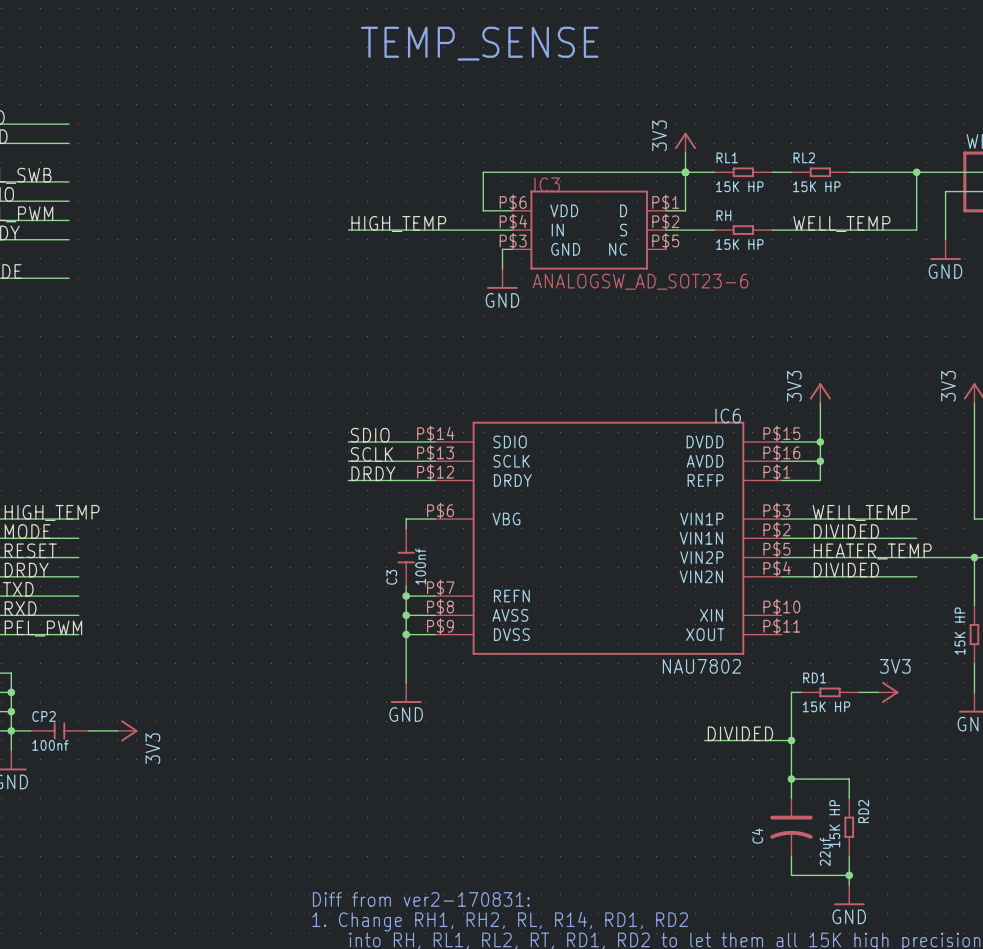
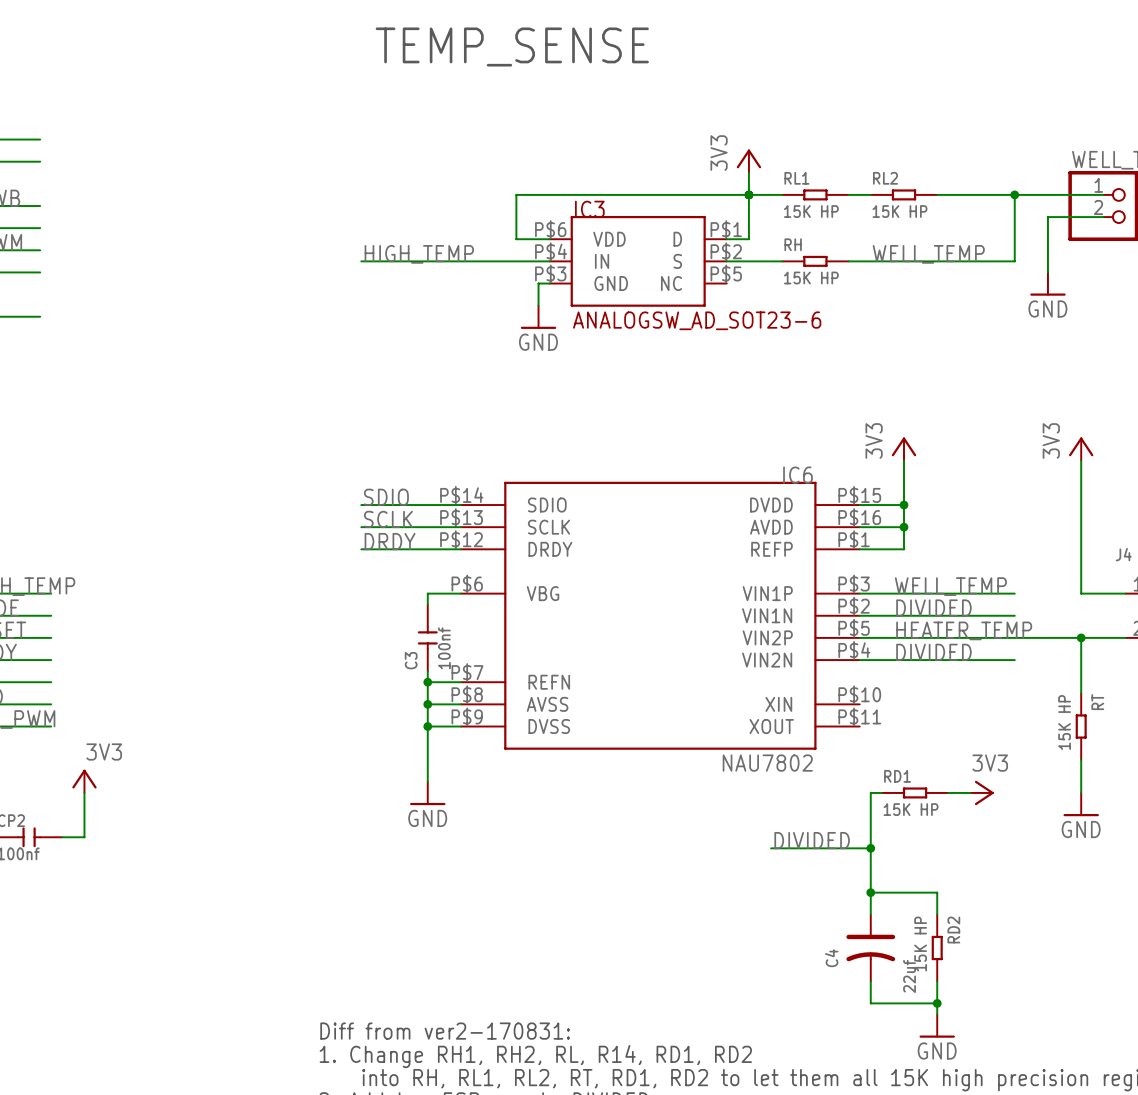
wire: (107, 730) (117, 730) -> (84, 837) (84, 792)
power symbol position: 3V3 (127, 730) -> 3V3 (84, 781)
power symbol rotation: 0° (129, 730) -> 90° counterclockwise (84, 779)

